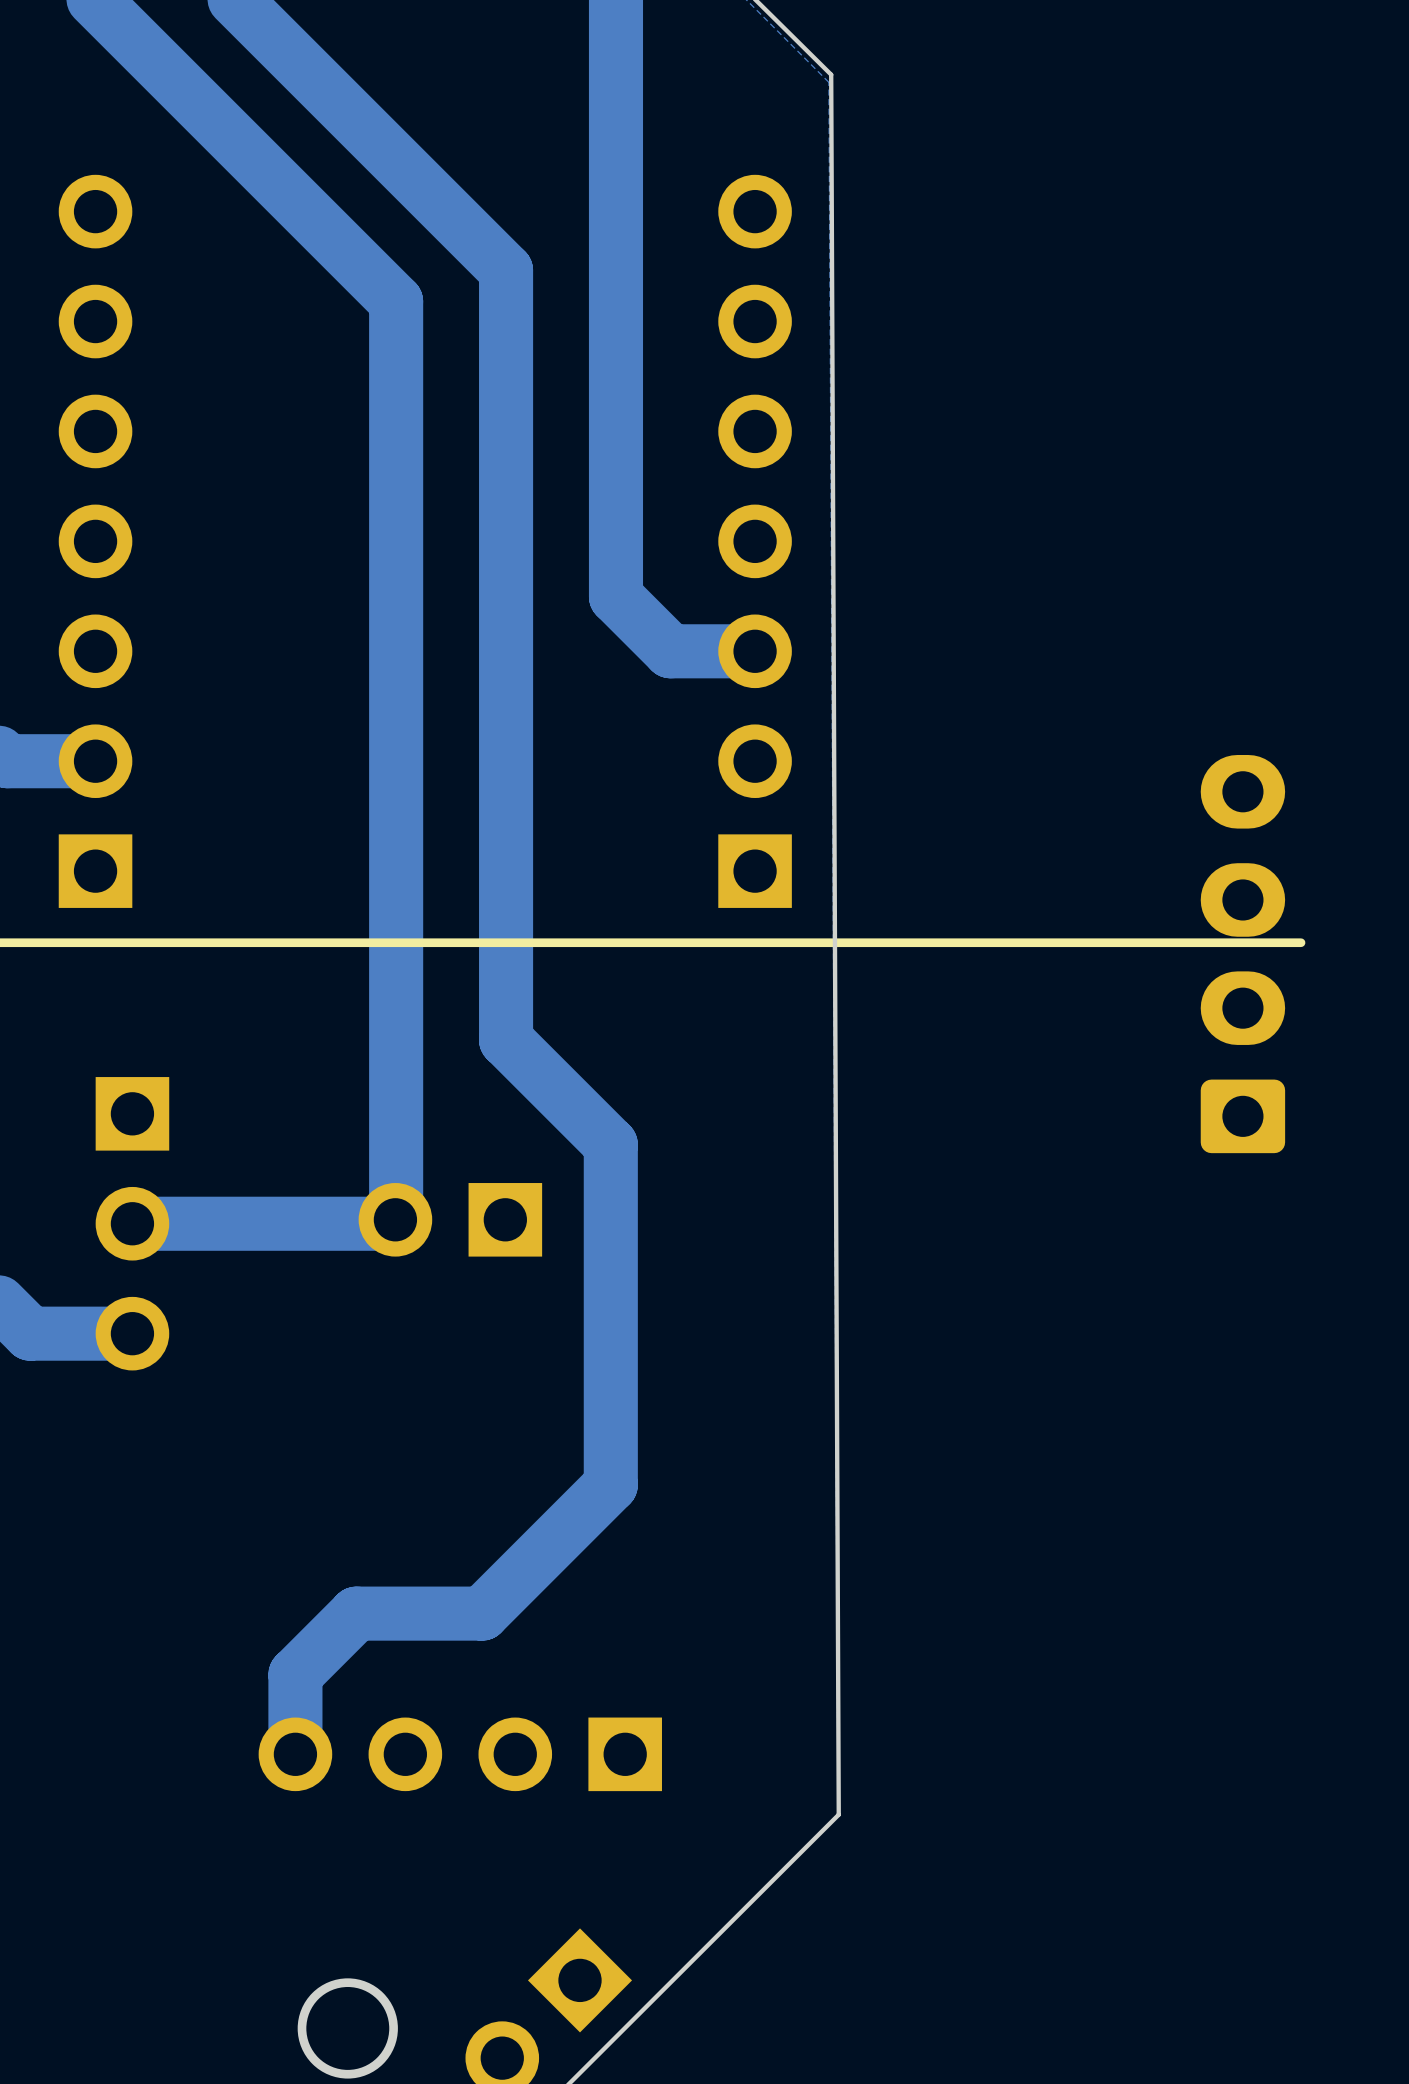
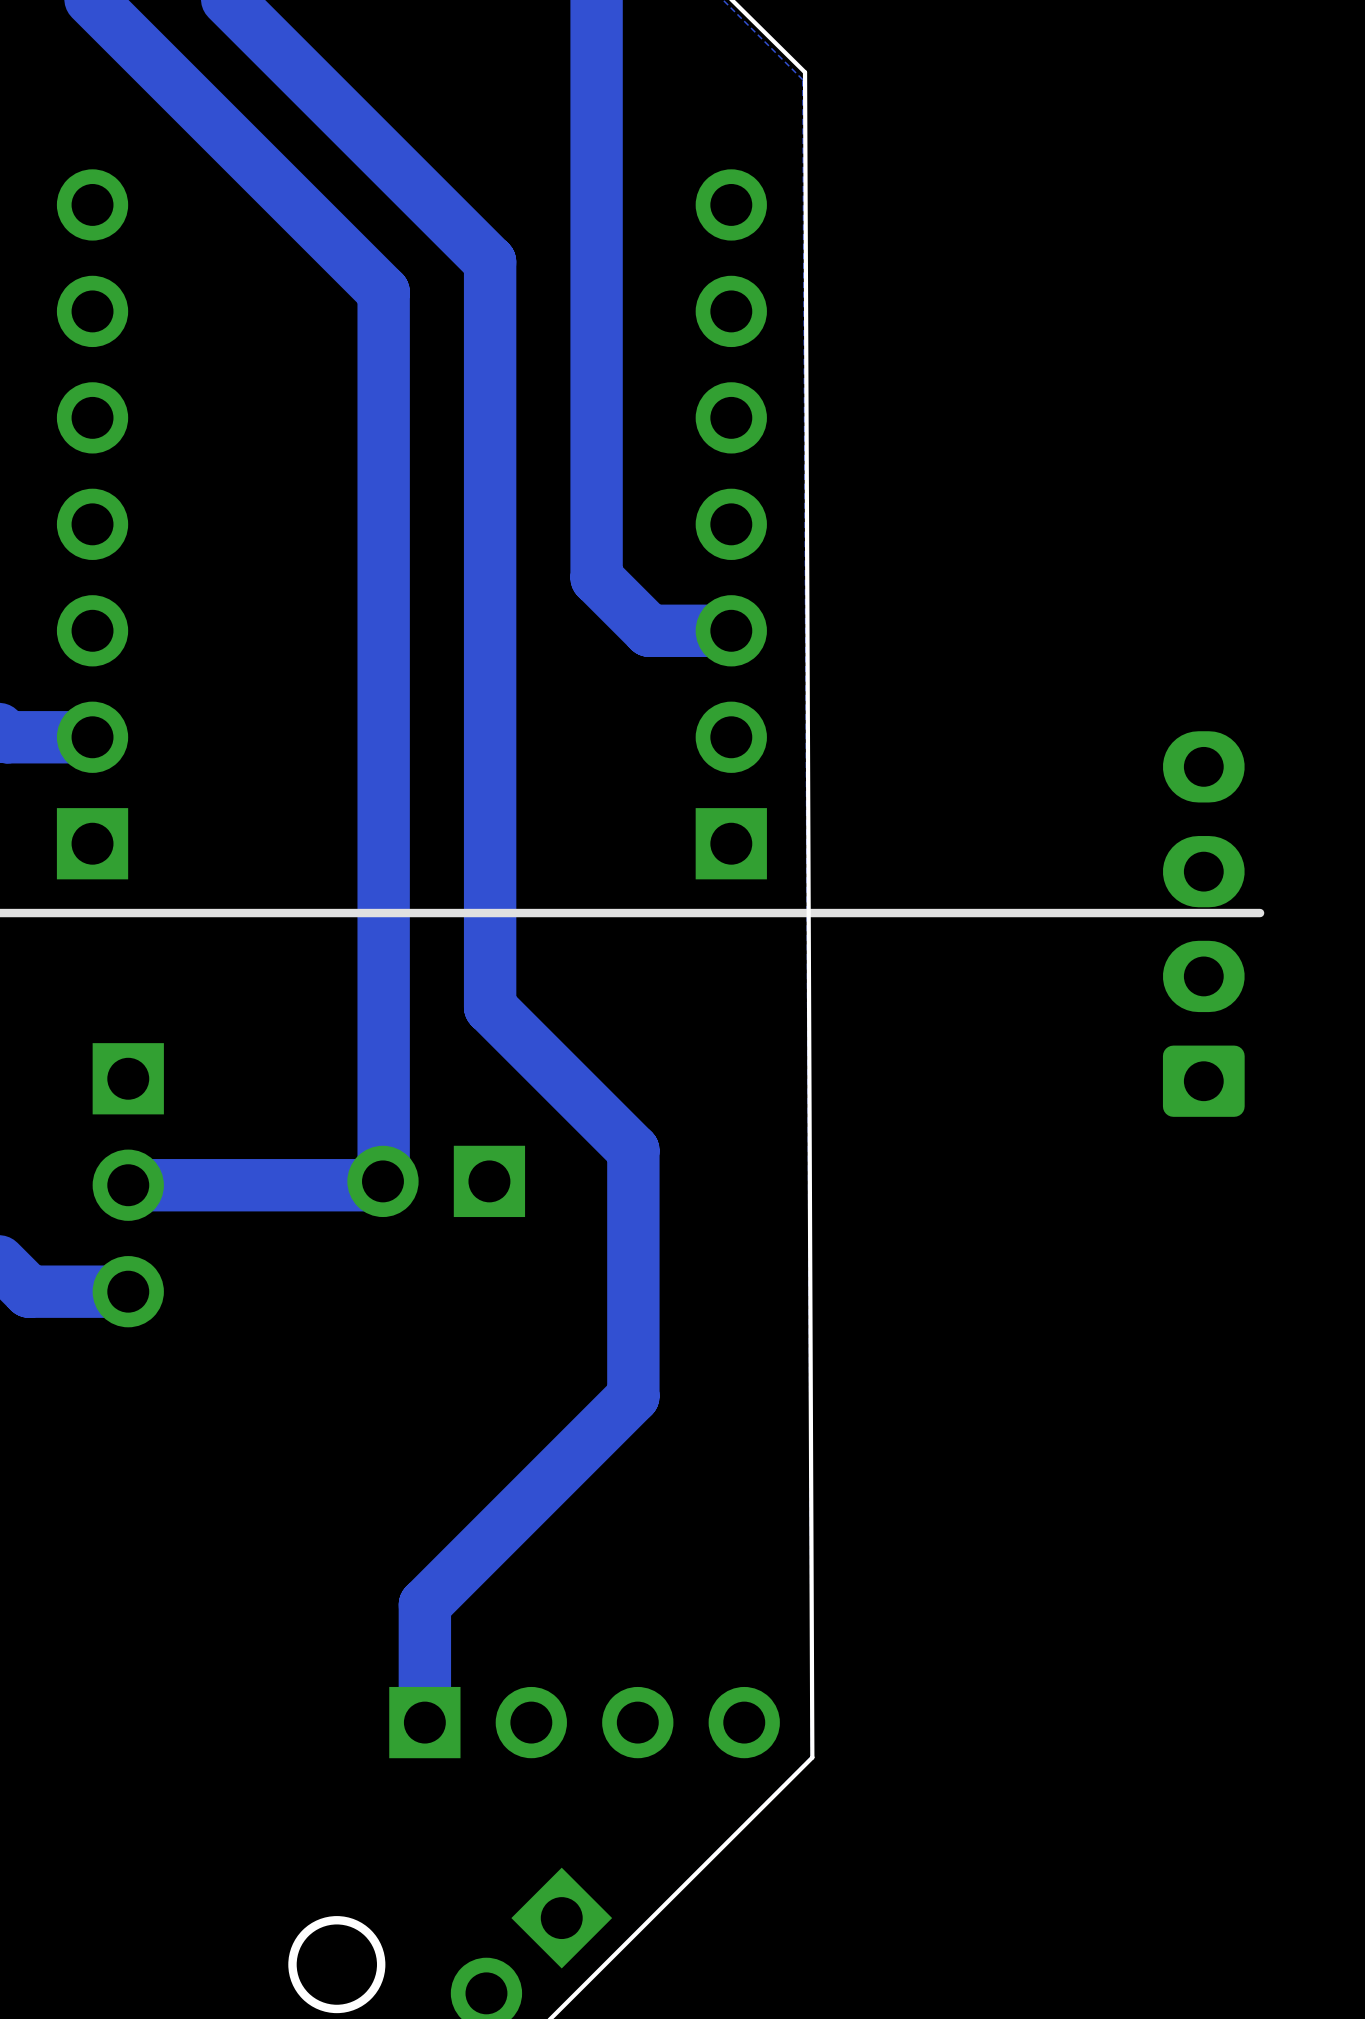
track: (610, 1144) (610, 1484) -> (591, 1108) (633, 1150) (633, 1396) (591, 1438)
track: (482, 1613) (356, 1613) (295, 1674) (295, 1754) -> (466, 1562) (424, 1604) (424, 1722)
part rotation: 0° (460, 1754) -> 180° (584, 1722)

